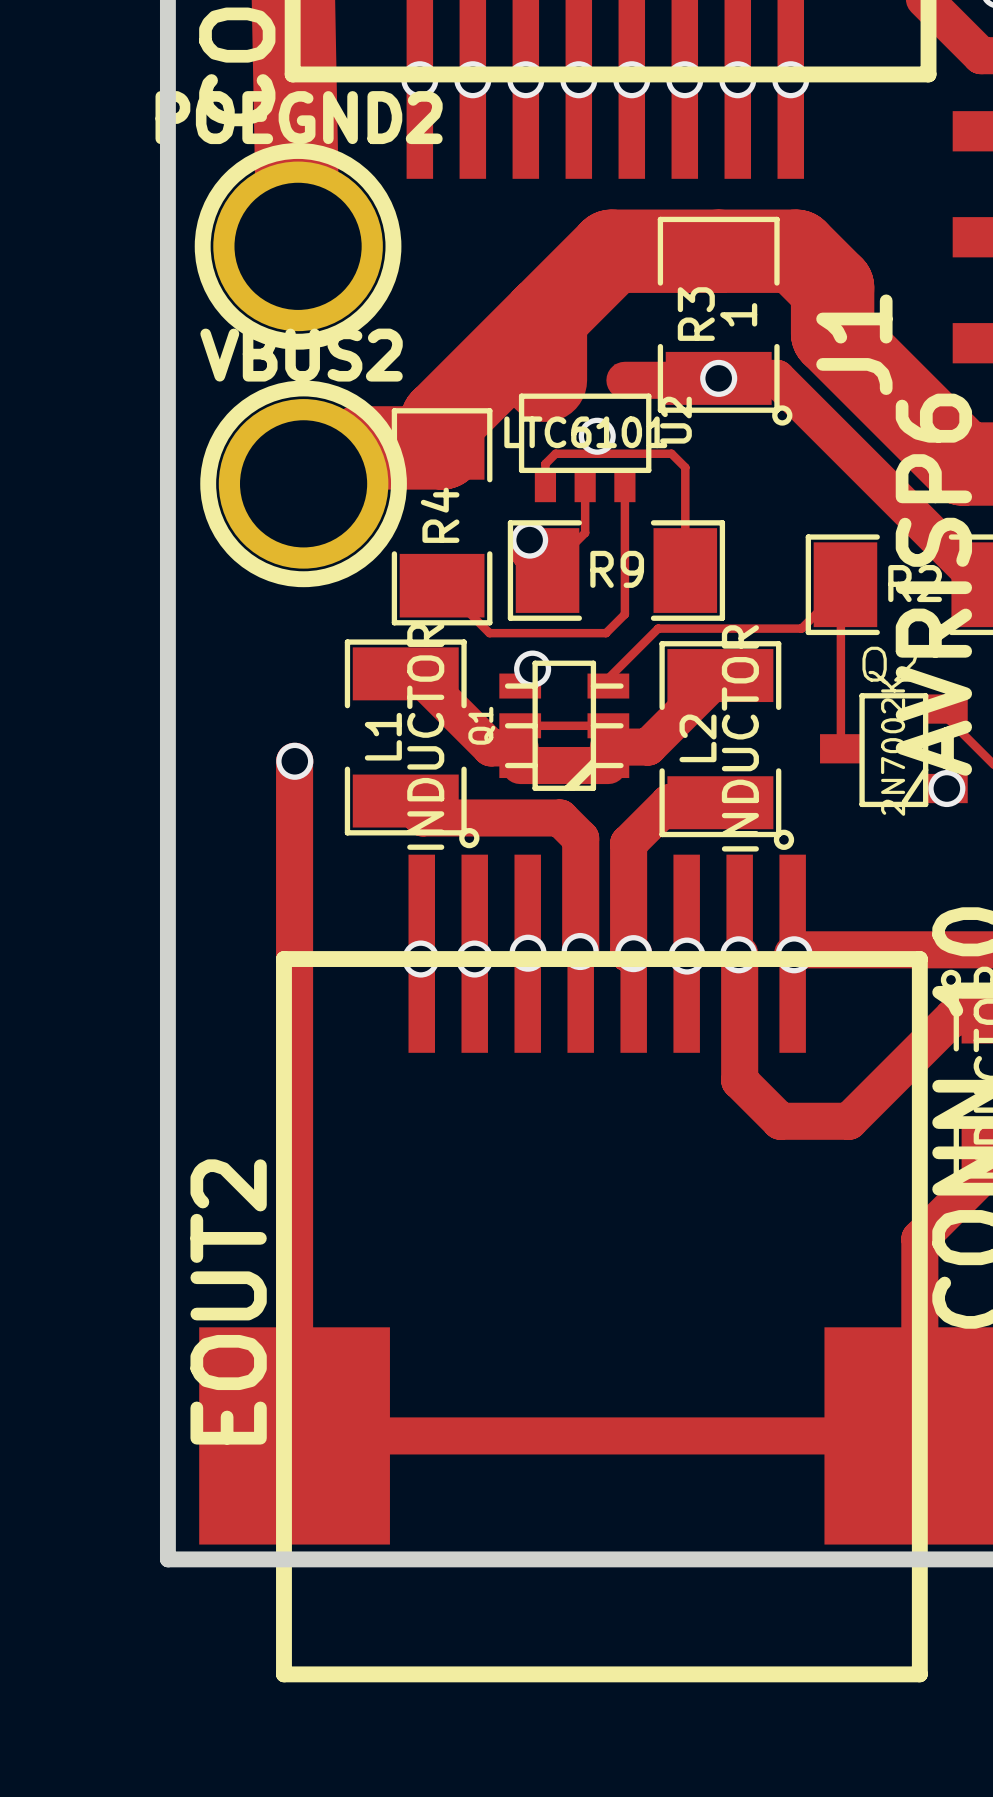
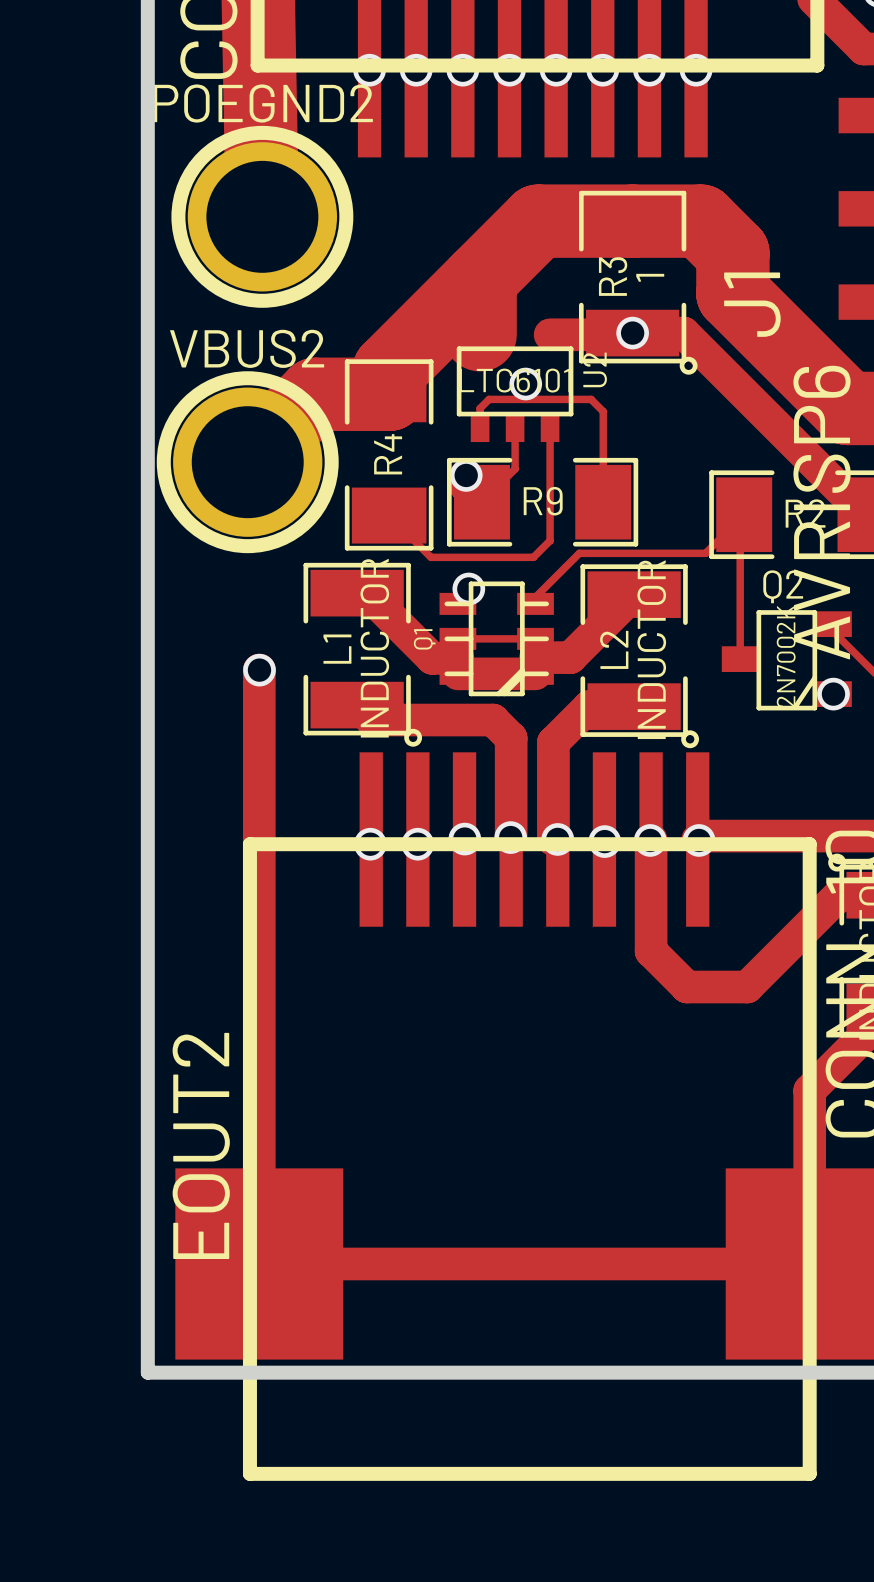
VBUS2 position: (303, 483) -> (247, 462)

